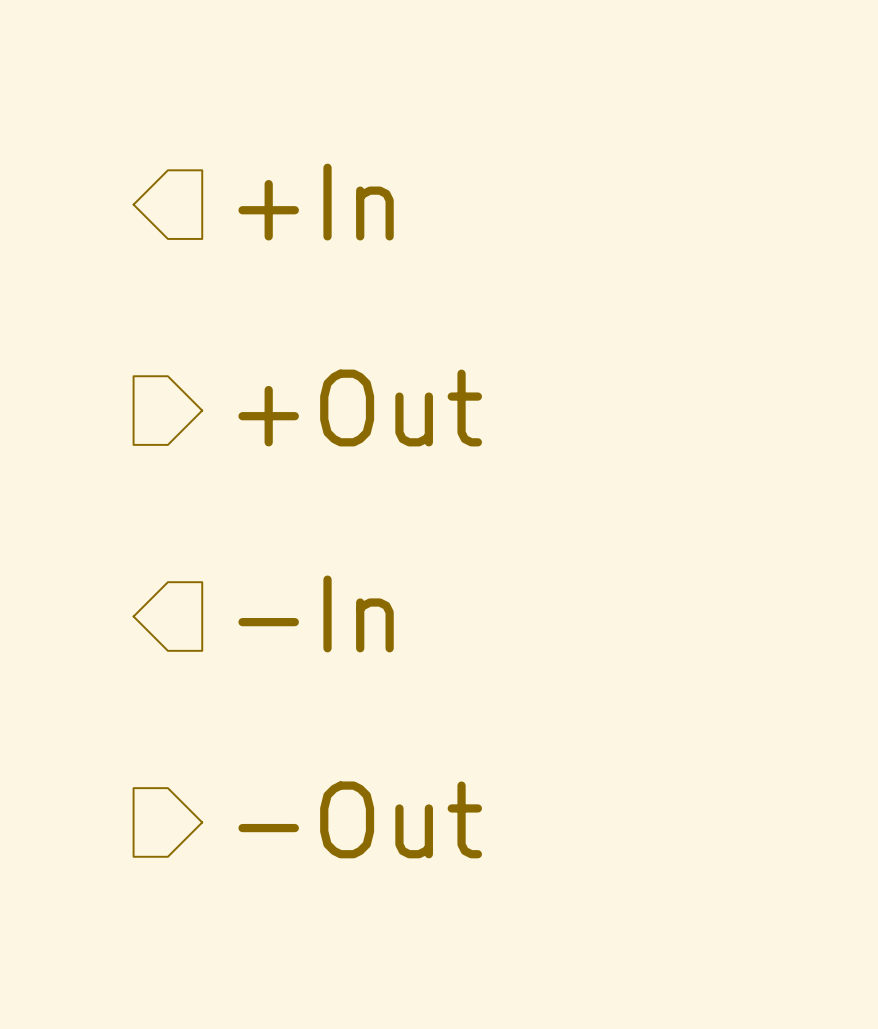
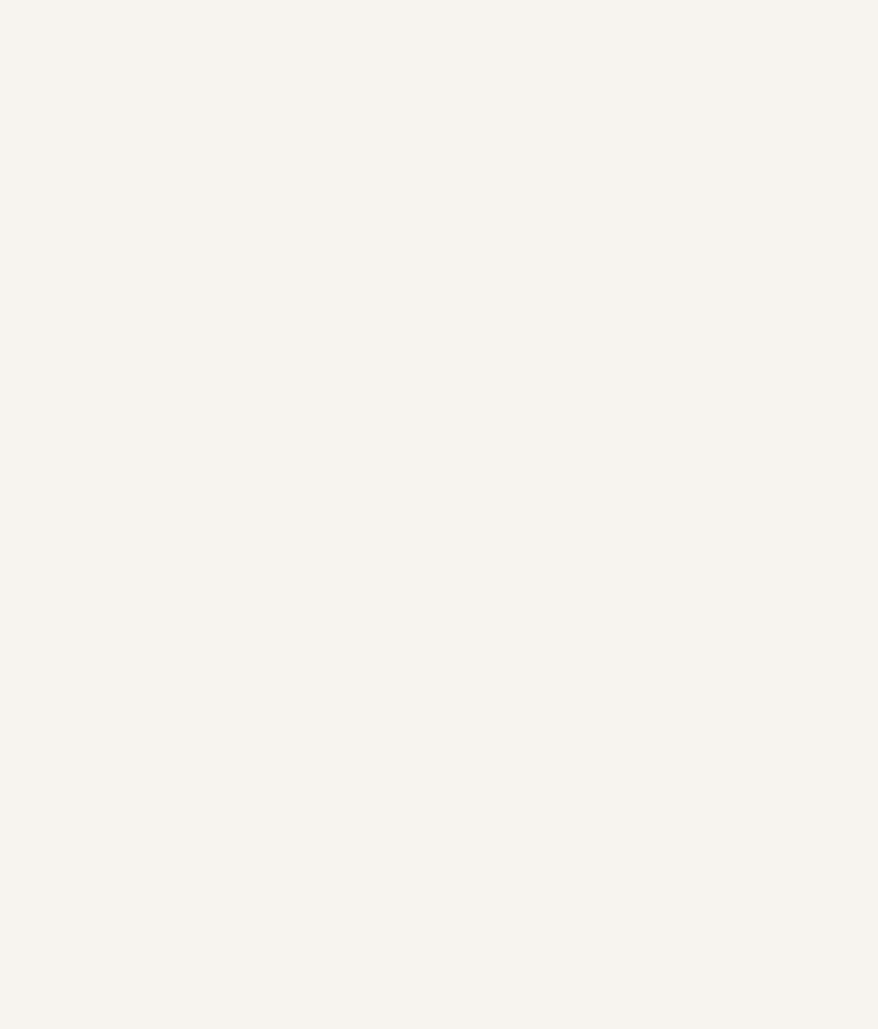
hierarchical label: +In (316, 202) -> none
hierarchical label: +Out (360, 408) -> none
hierarchical label: -In (316, 613) -> none
hierarchical label: -Out (360, 819) -> none

